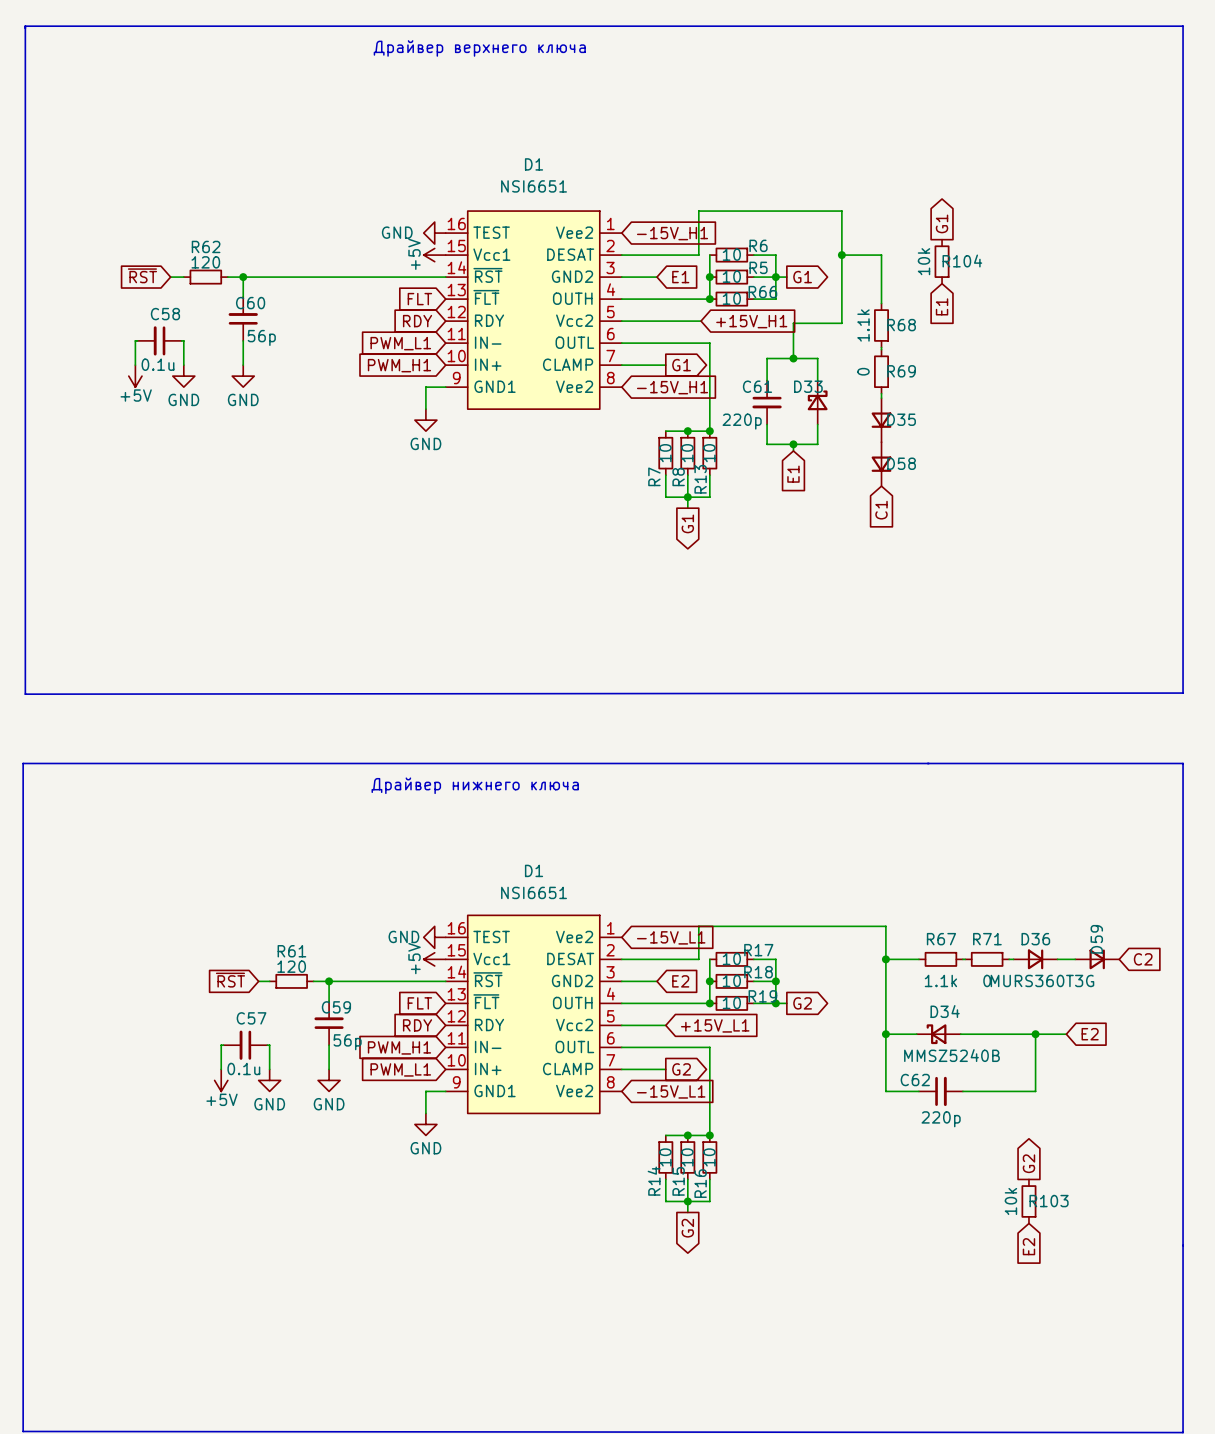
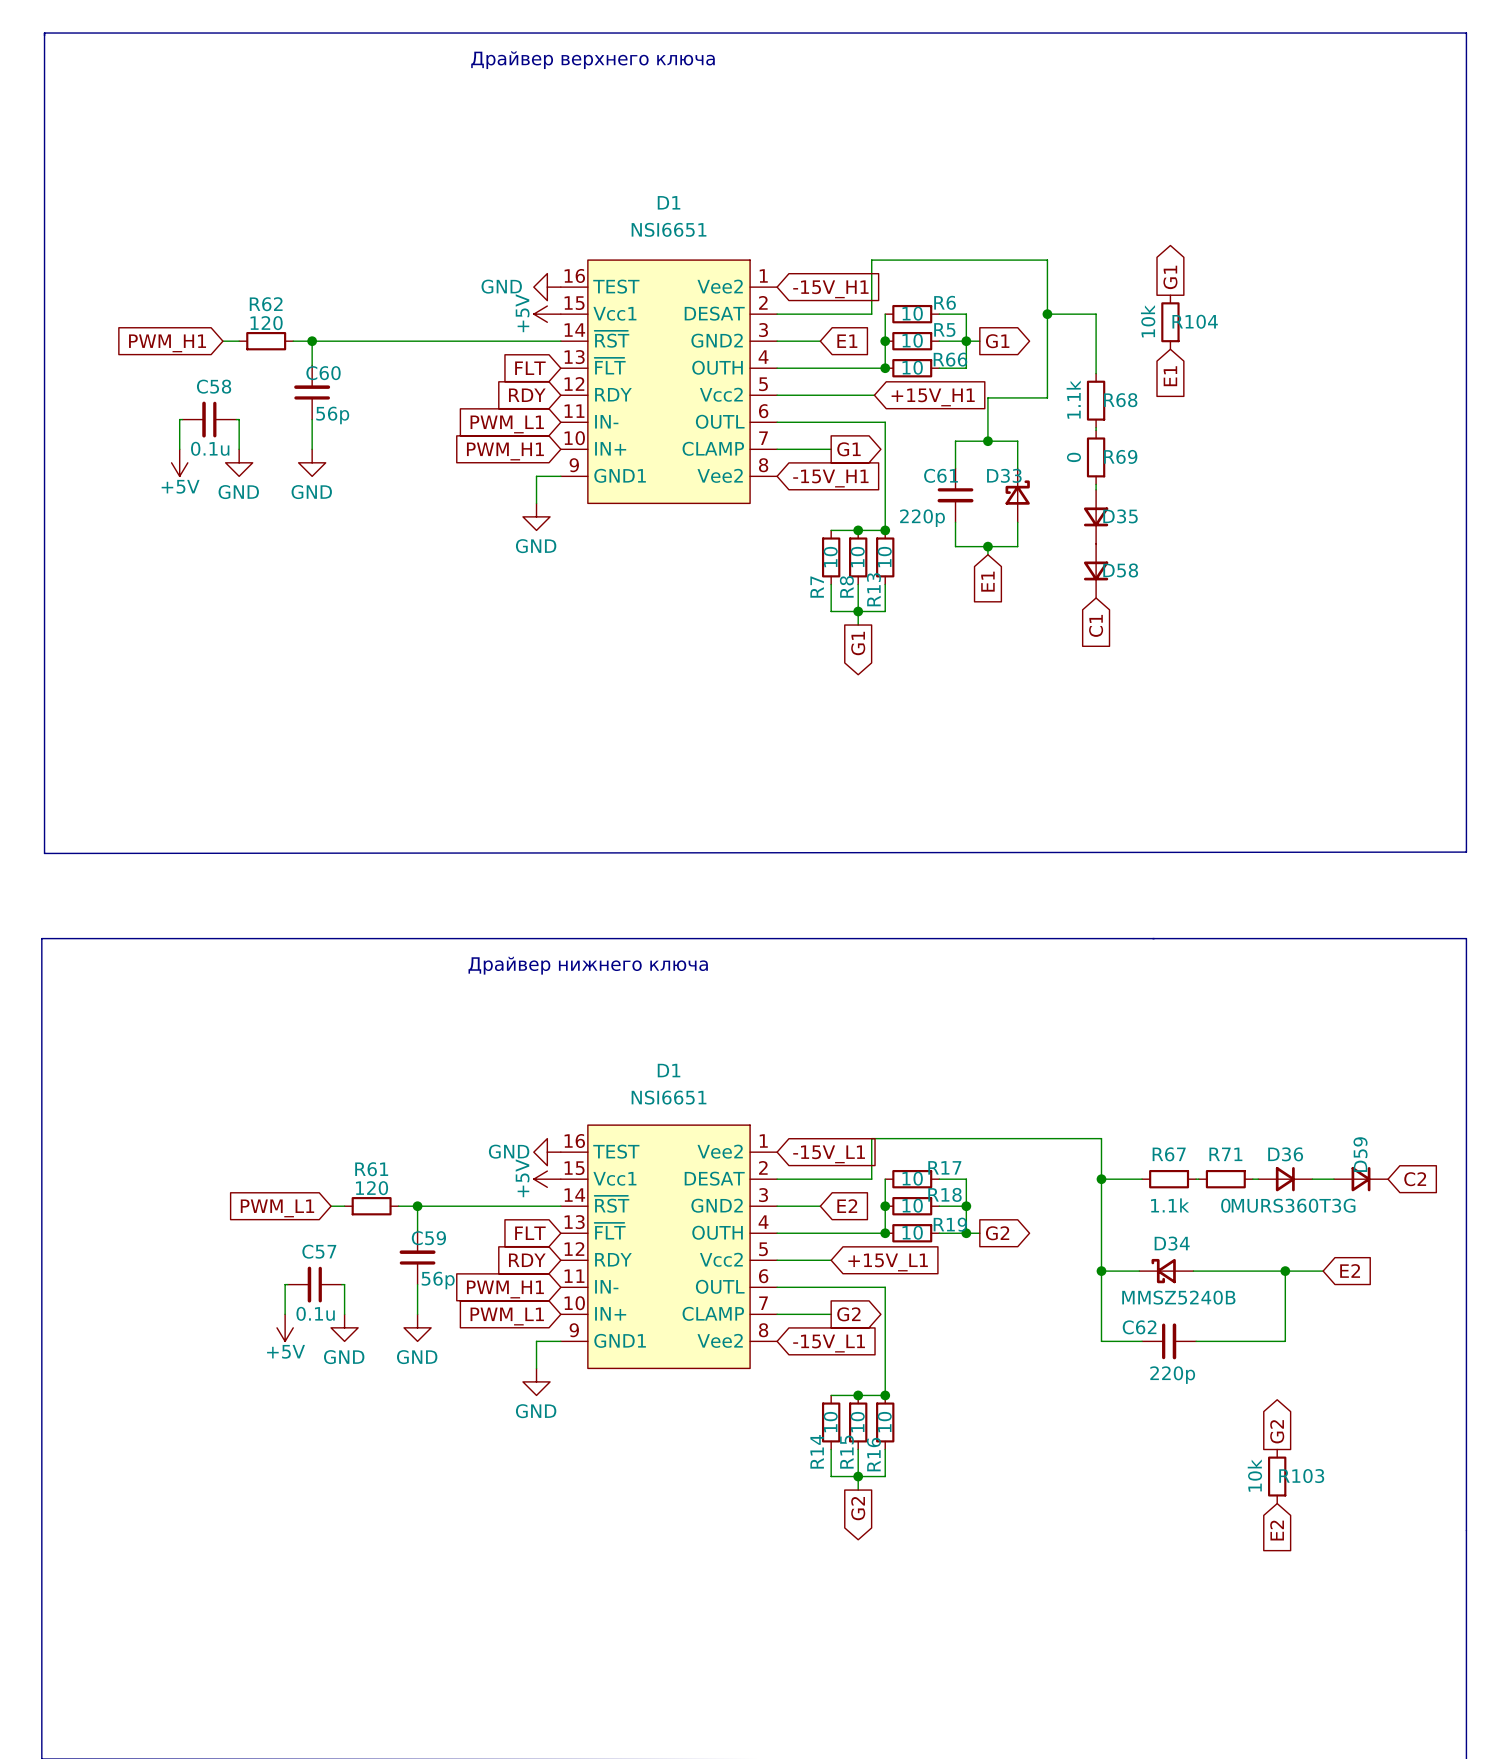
global label: ~{RST} (142, 275) -> PWM_H1 (167, 343)
global label: ~{RST} (230, 980) -> PWM_L1 (277, 1208)

